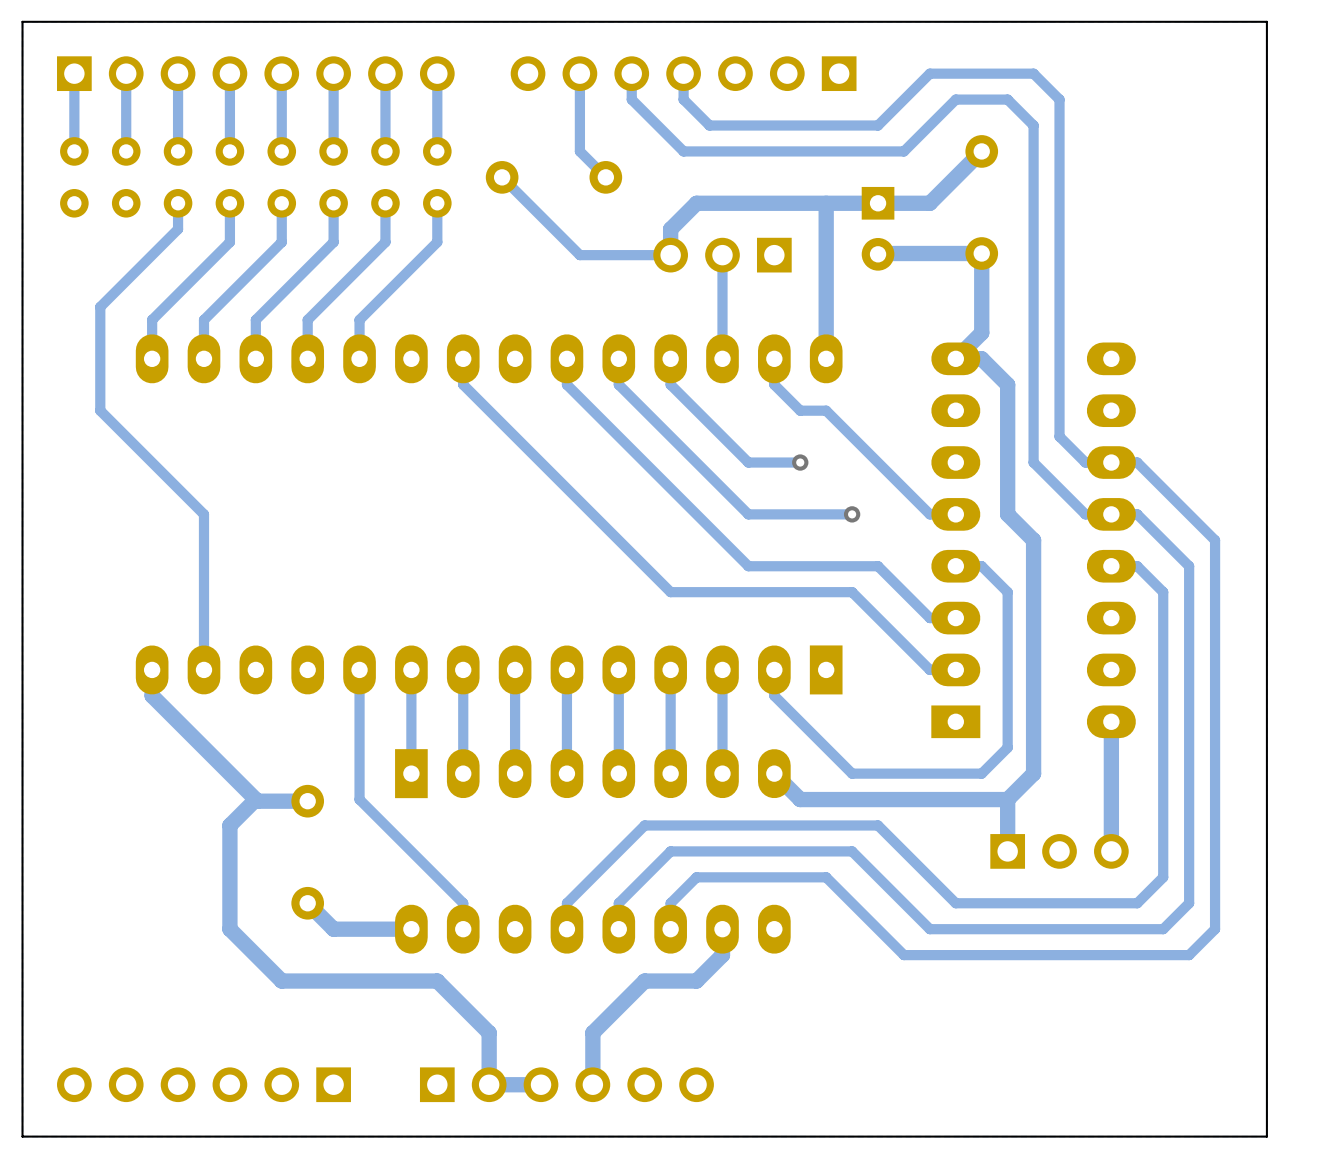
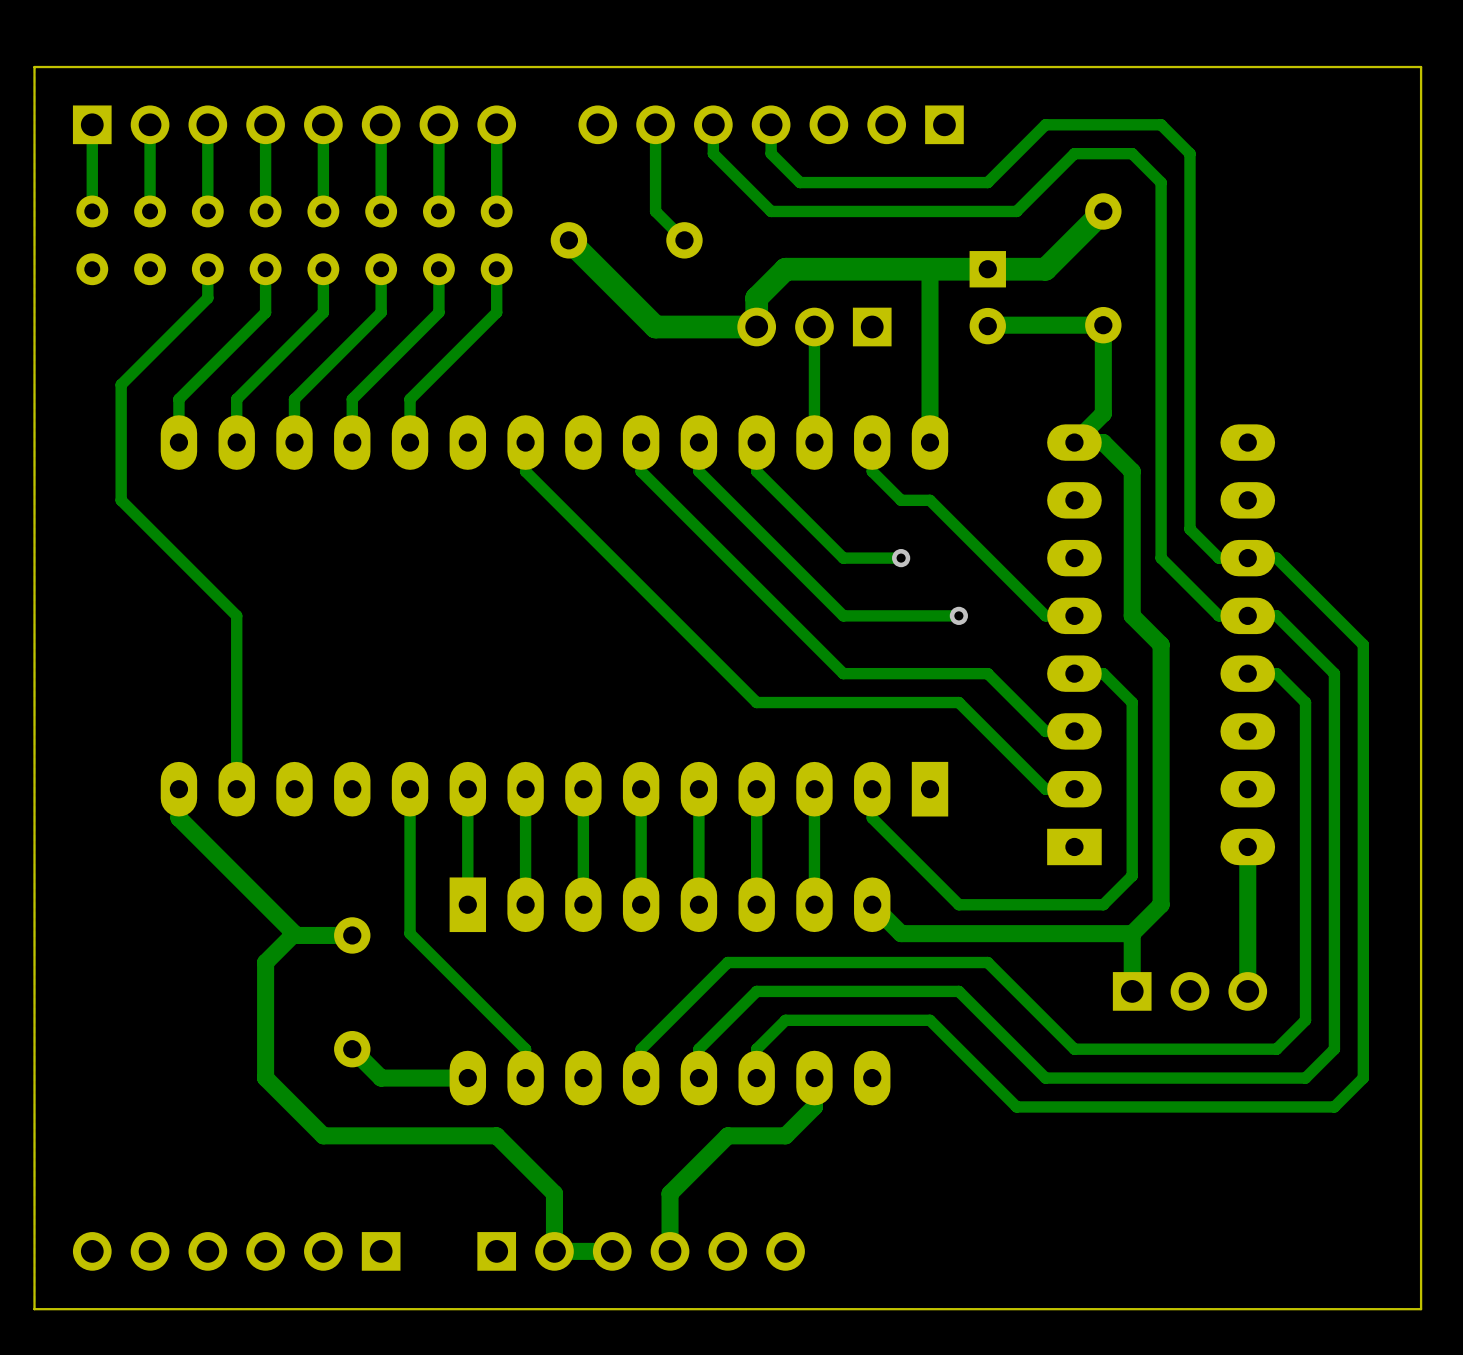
track width: thin (981, 151) (929, 203) (696, 203) (670, 229) (670, 255) (579, 255) (502, 177) -> thick (1103, 211) (1045, 269) (785, 269) (756, 298) (756, 327) (655, 327) (568, 240)

